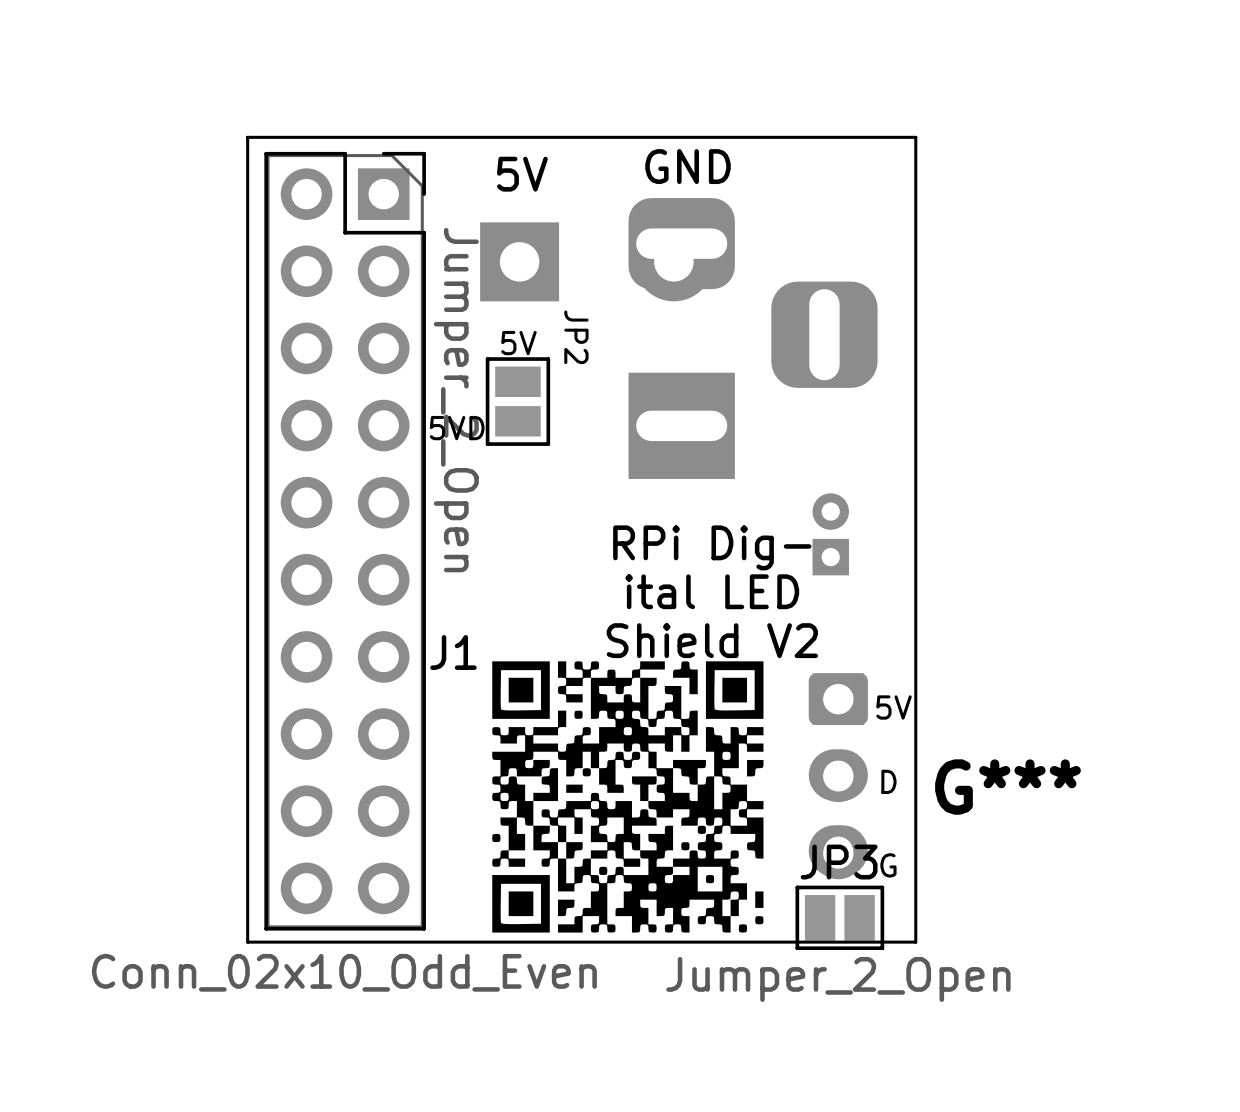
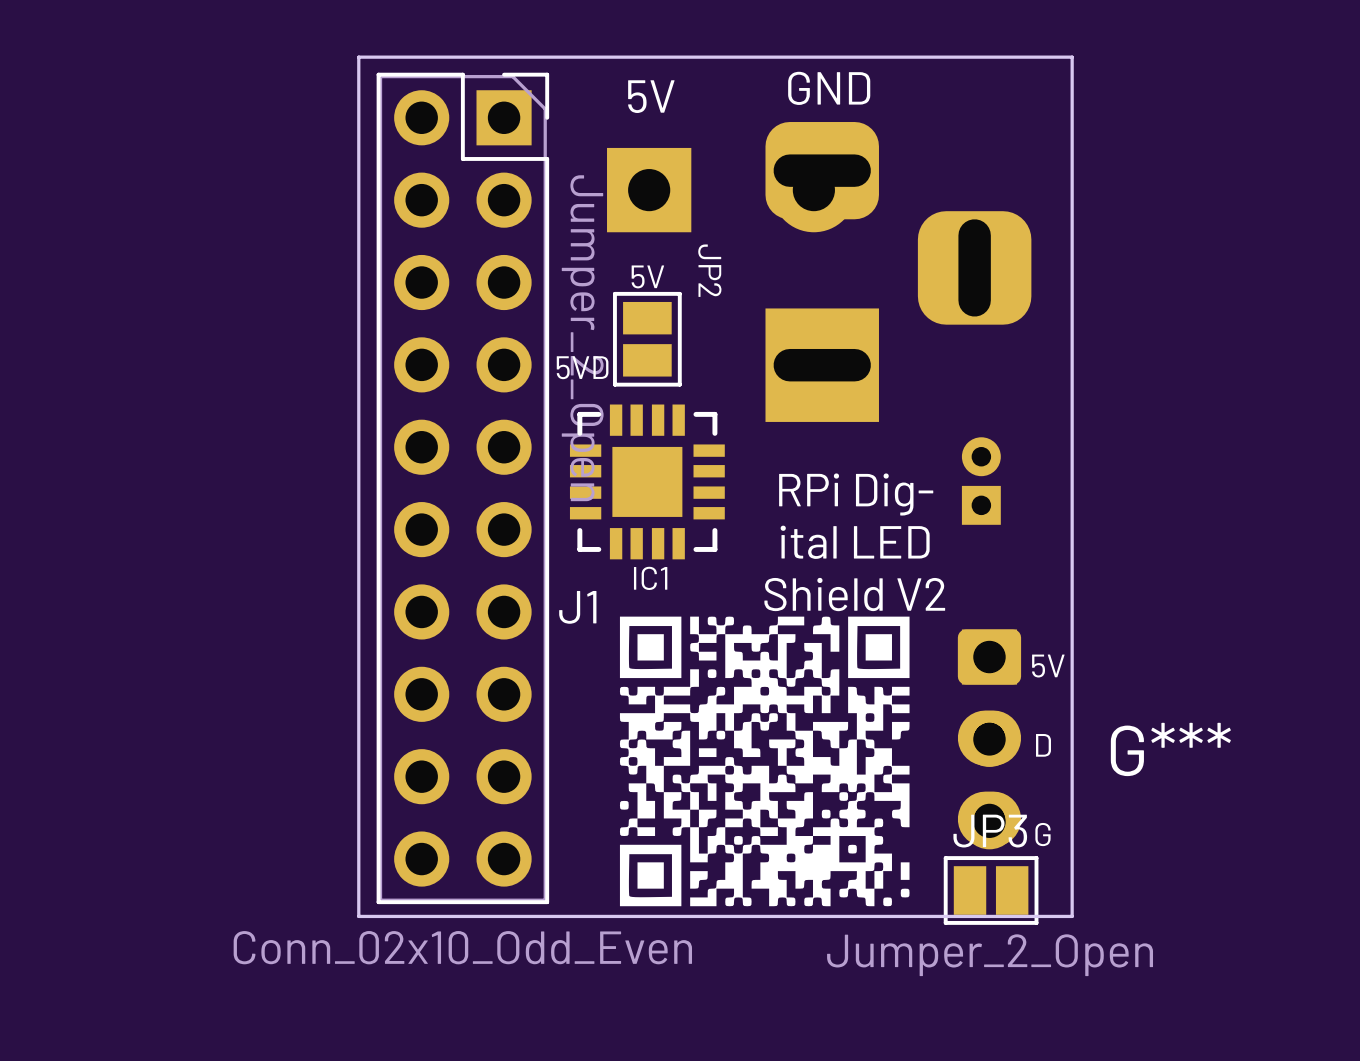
IC1: none -> (647, 481)

